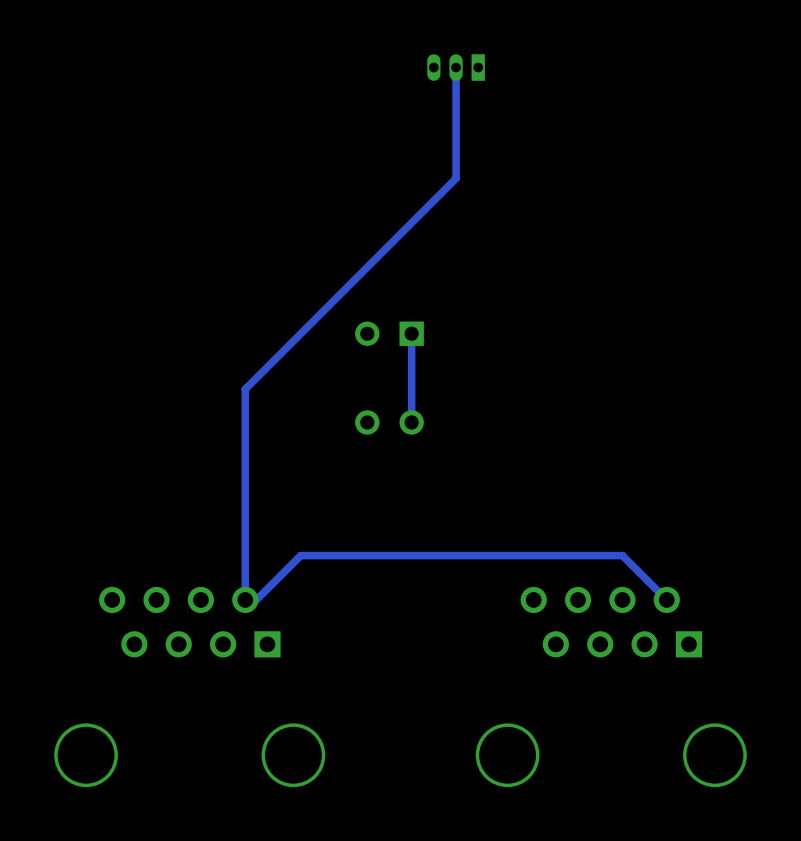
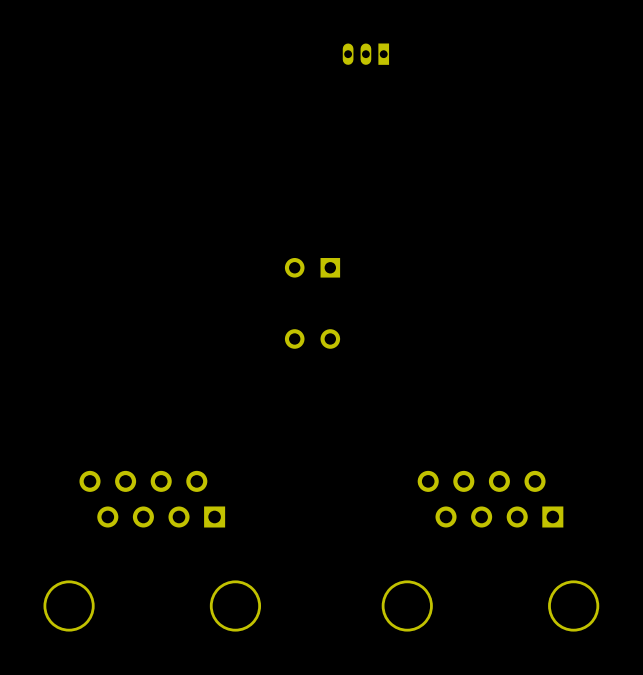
bottom track: (456, 67) (456, 178) (245, 389) (245, 599) (256, 599) (300, 555) (622, 555) (666, 599) -> none
bottom track: (411, 333) (411, 422) -> none

